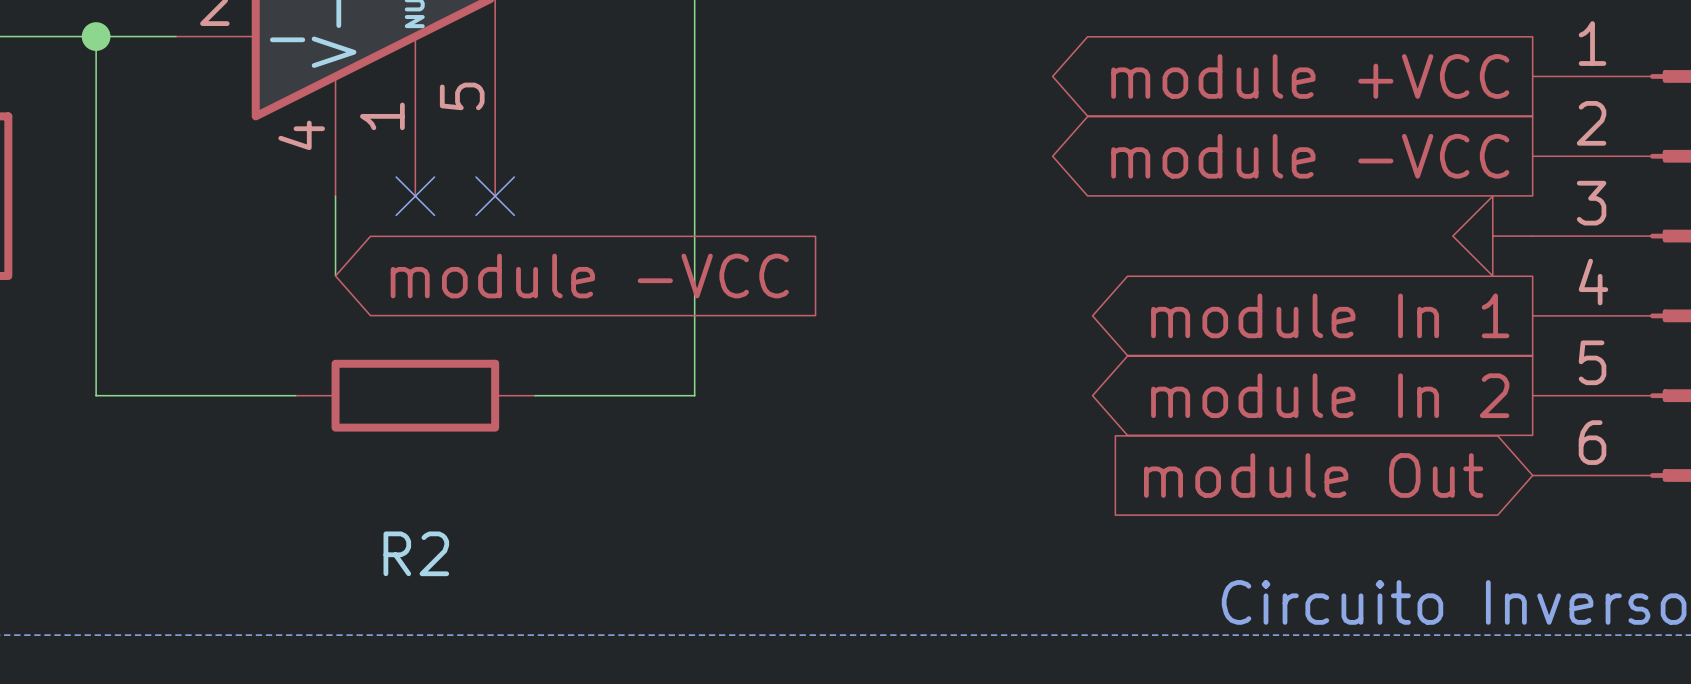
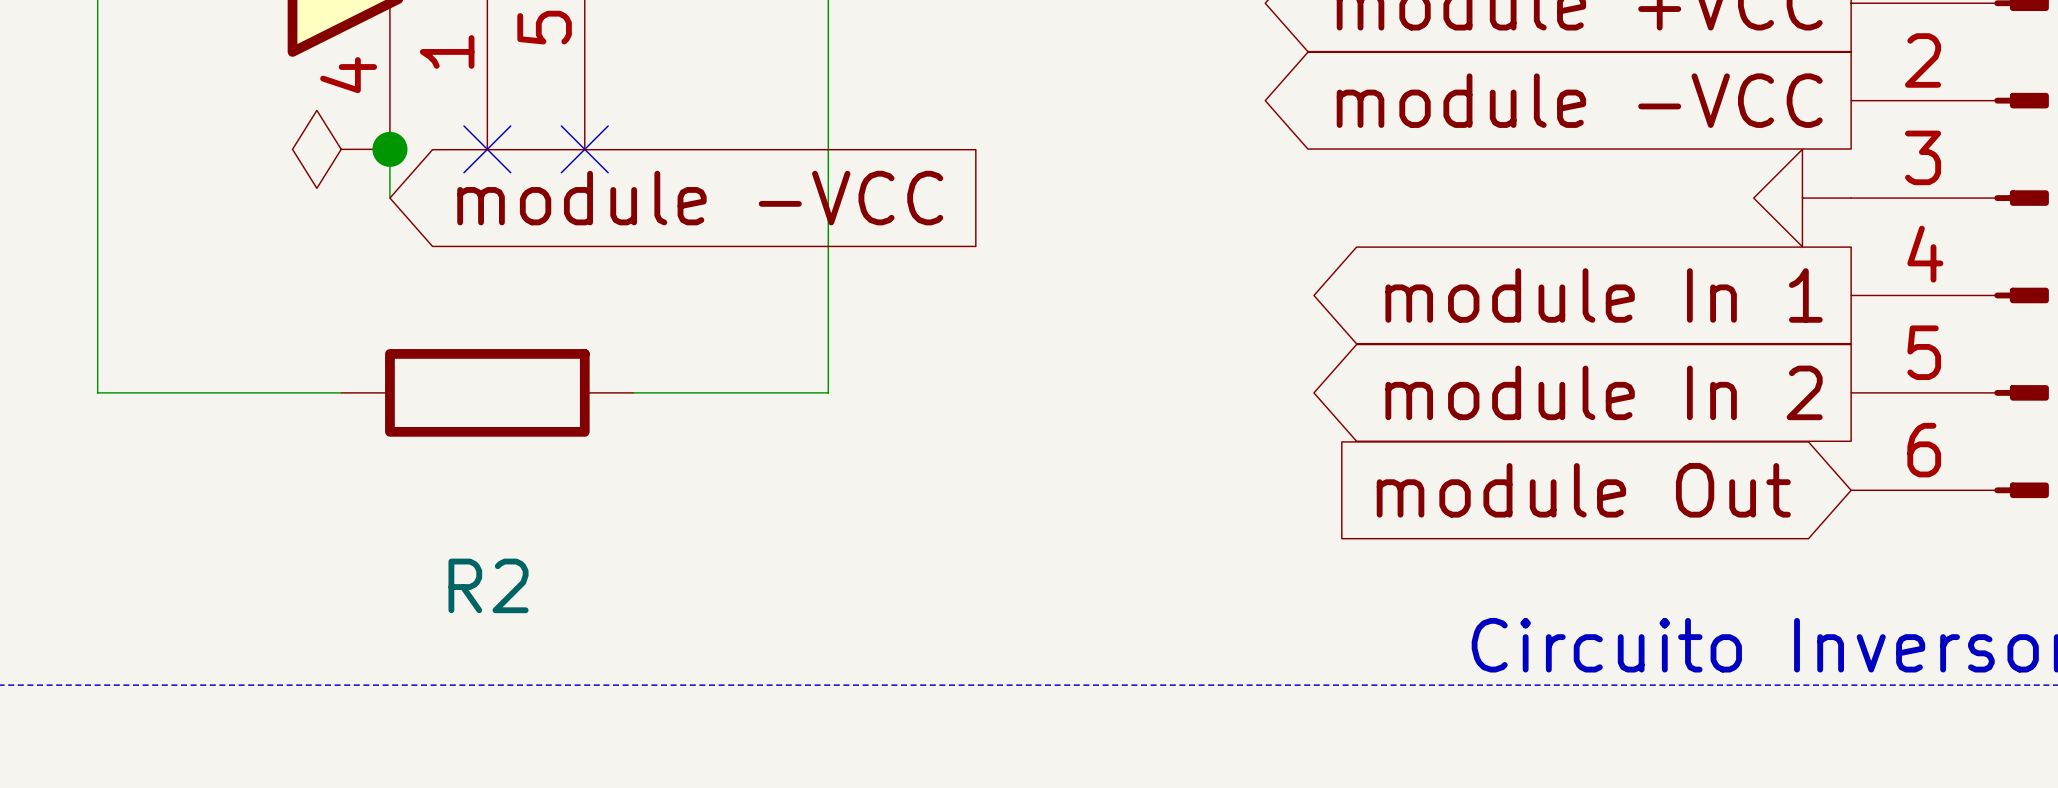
power symbol: none -> (341, 149)
junction: none -> (389, 149)
wire: (335, 236) (335, 275) -> none
global label position: module -VCC (589, 275) -> module -VCC (700, 198)

